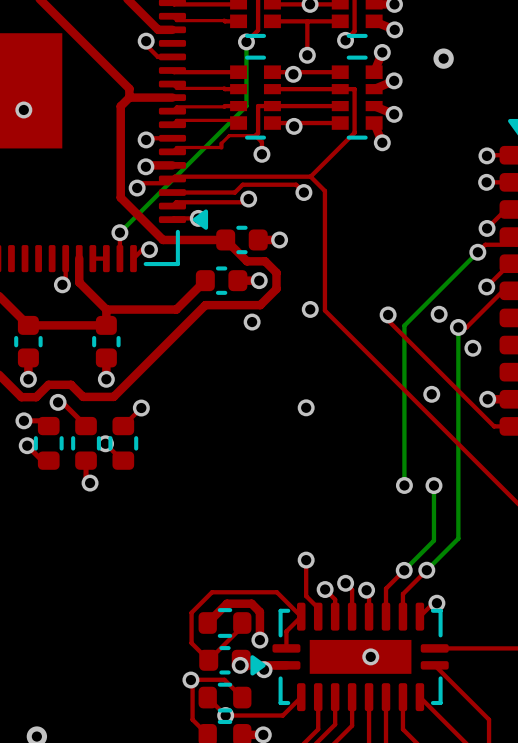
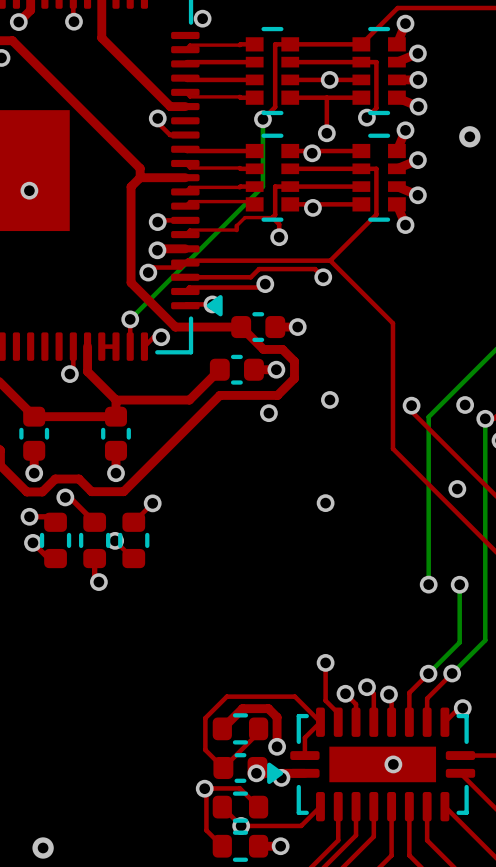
top track: (324, 190) (324, 310) (370, 356) -> (345, 275) (392, 323) (392, 448)

